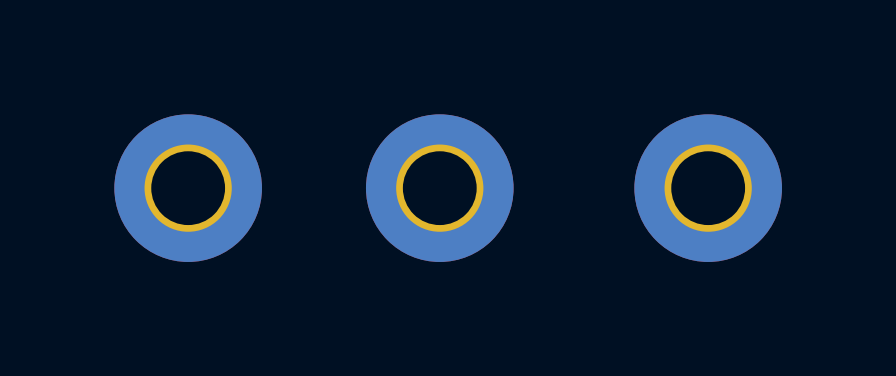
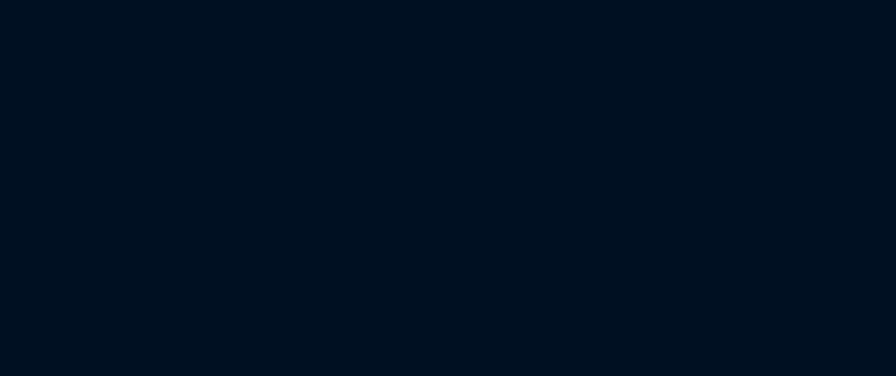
part: (188, 188) -> none
part: (439, 188) -> none
part: (708, 188) -> none

